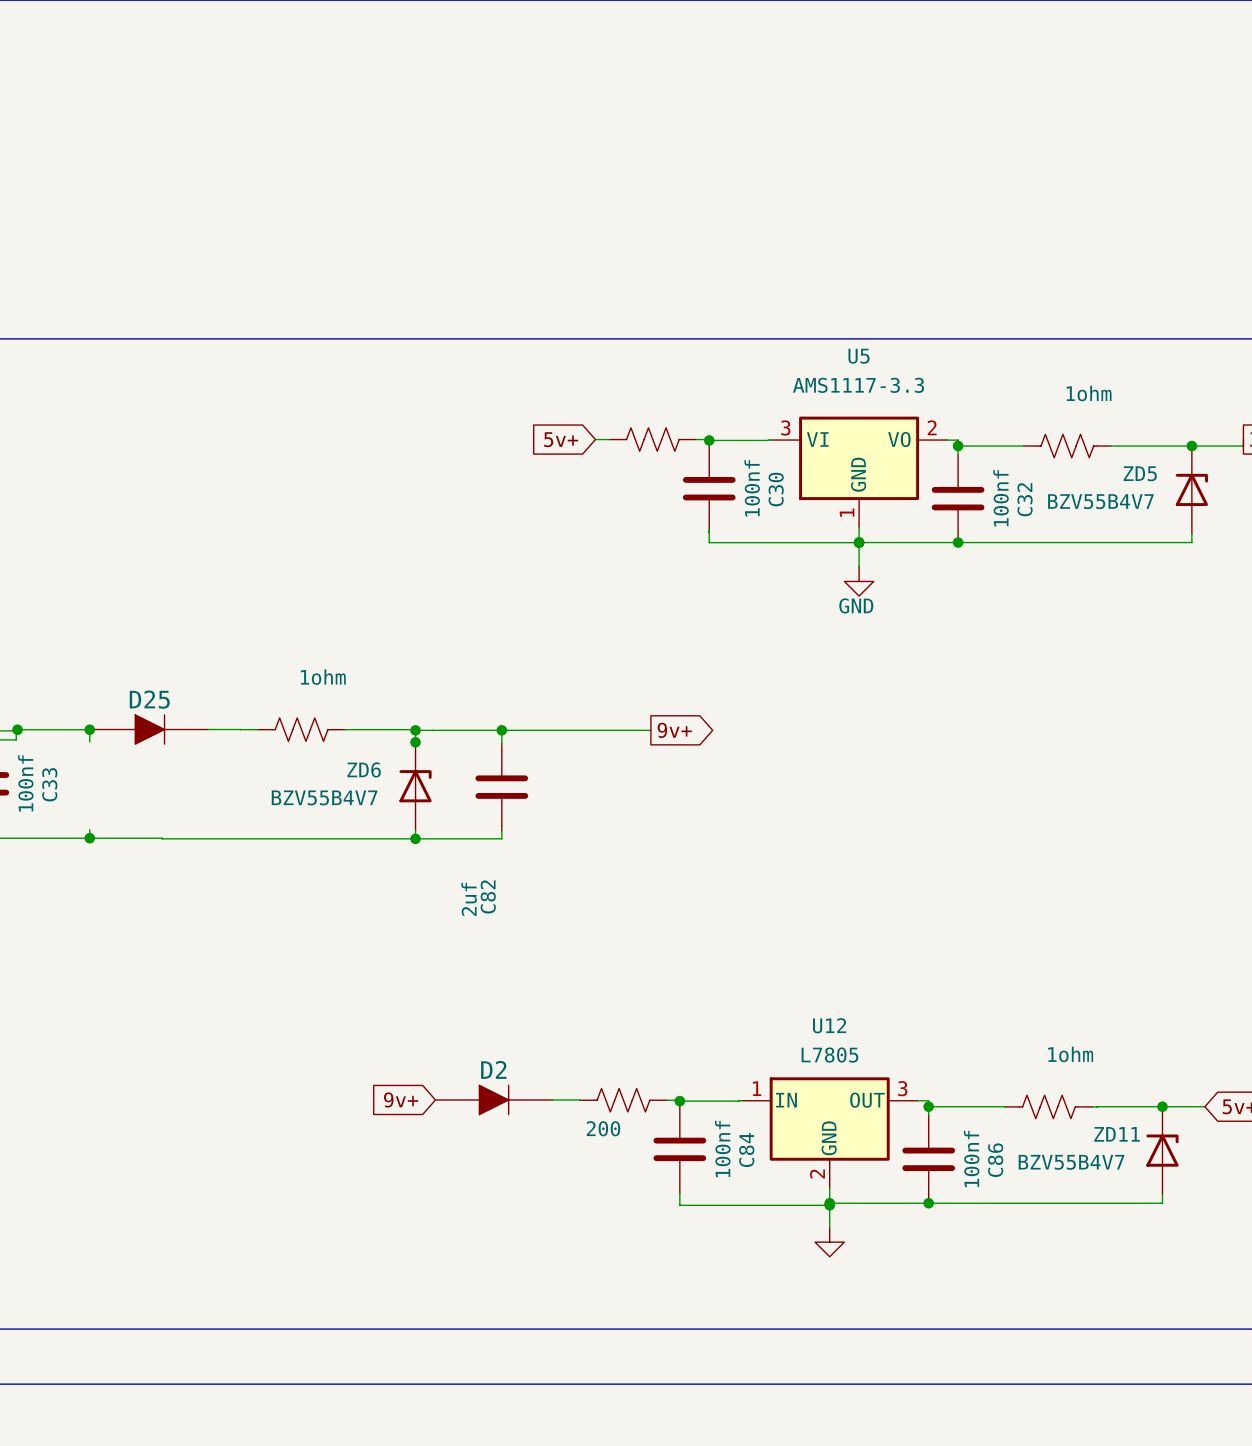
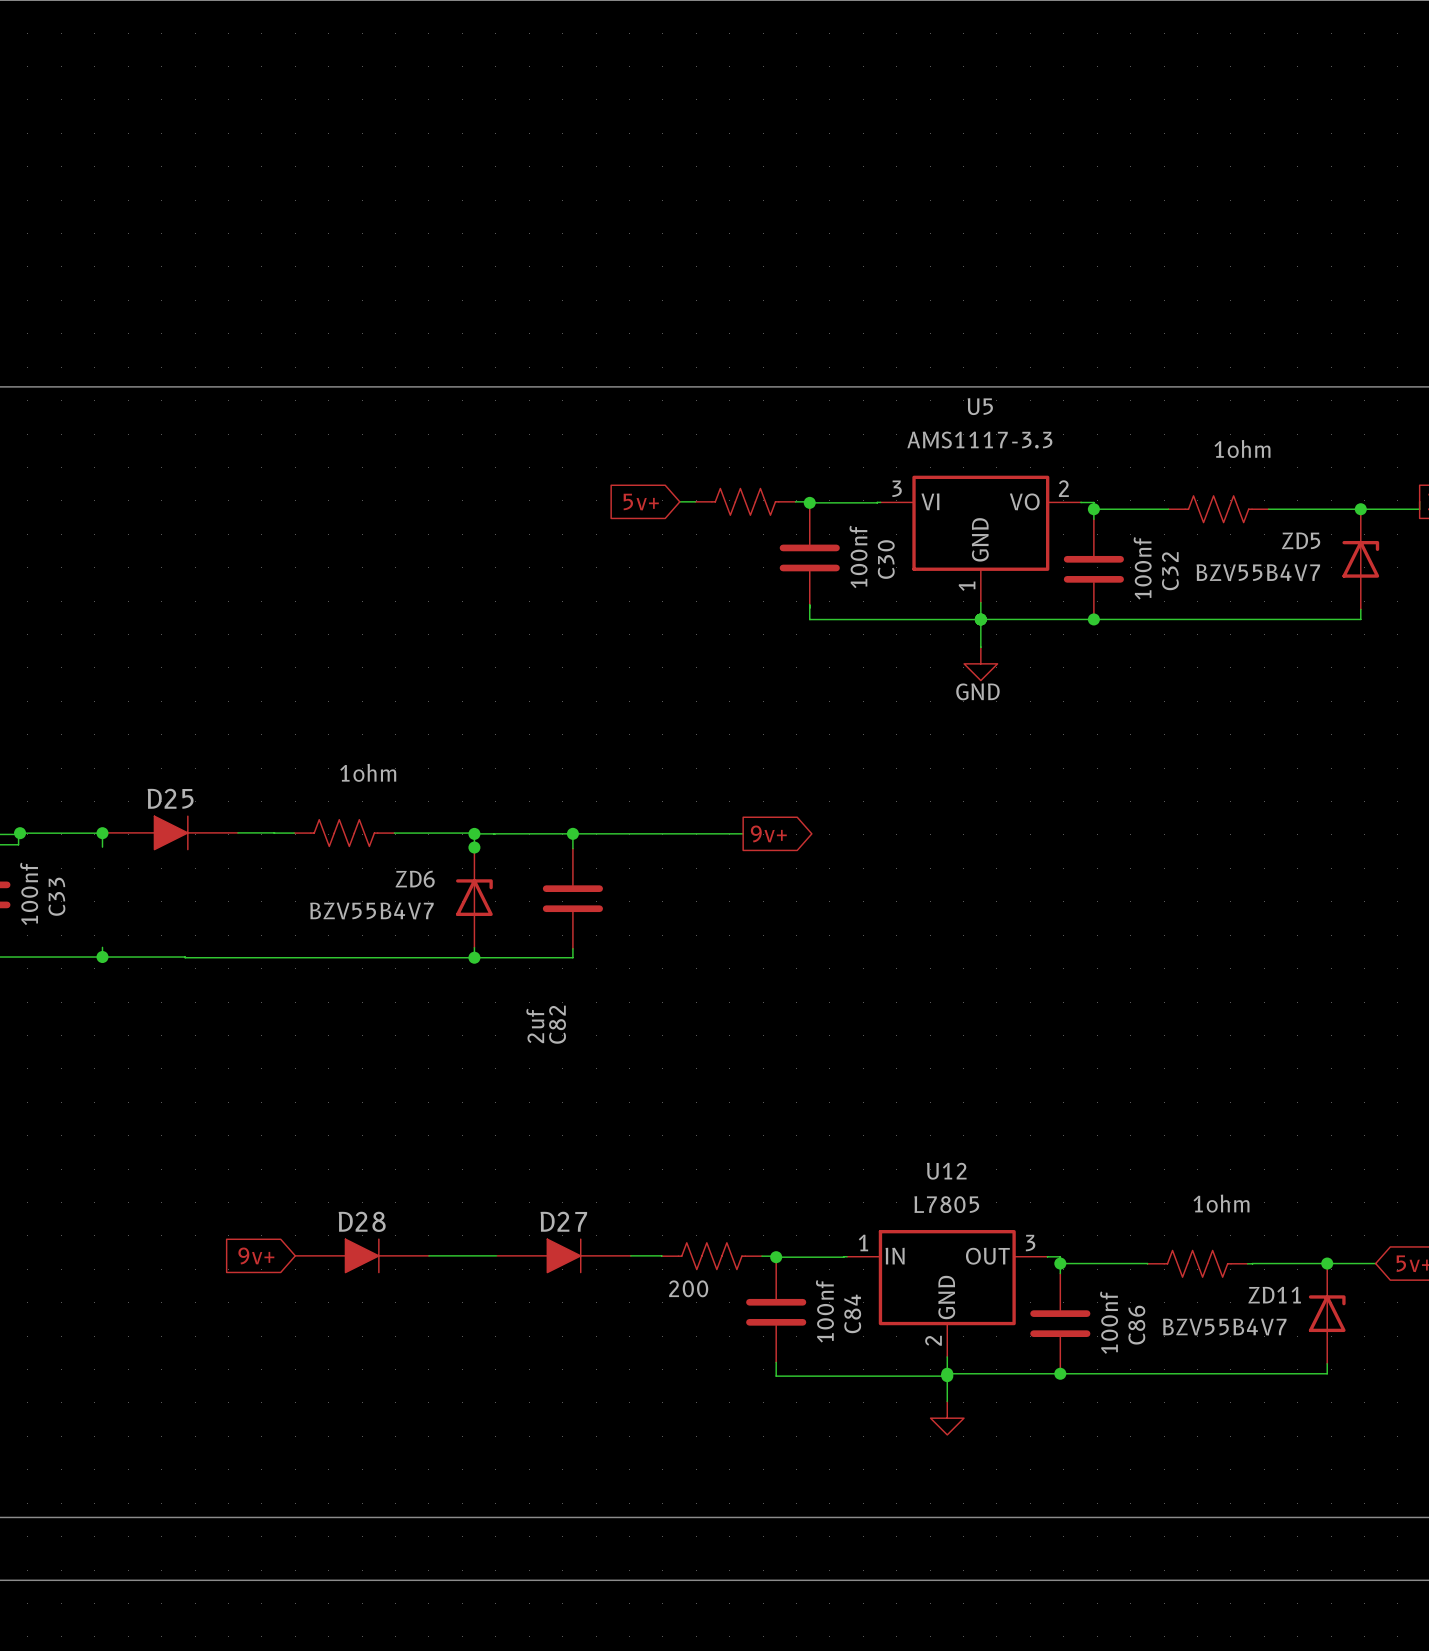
D2 name: D2 (493, 1069) -> D27 (563, 1221)
D28: none -> (362, 1255)
wire: none -> (428, 1255) (496, 1255)
global label position: 9v+ (401, 1099) -> 9v+ (256, 1256)

